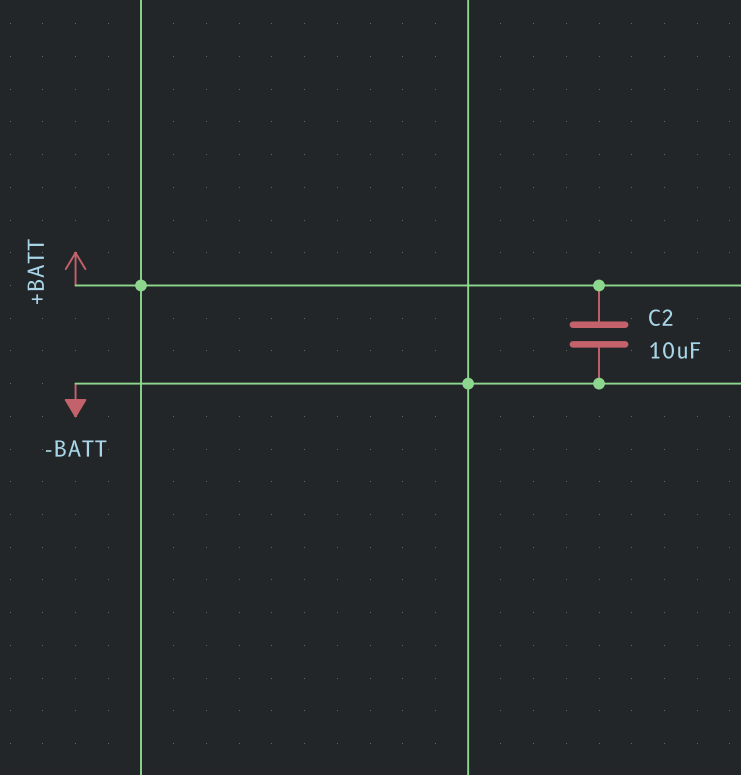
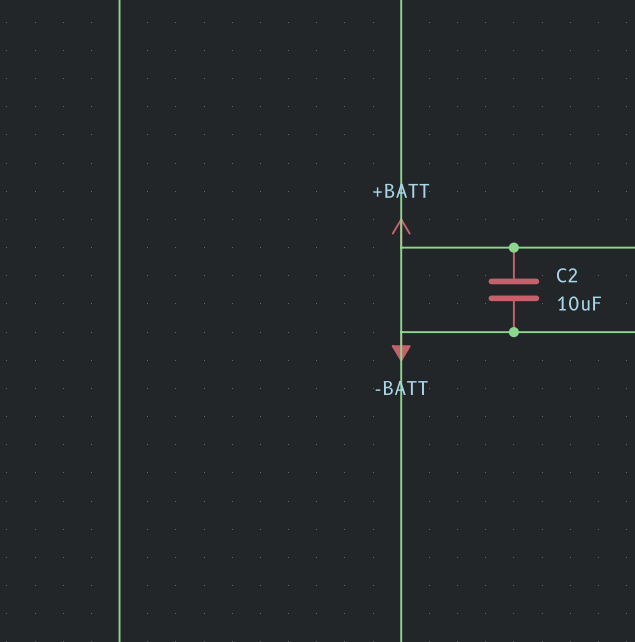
power symbol: +BATT (75, 269) -> none
power symbol: none -> +BATT (401, 233)
wire: (75, 285) (468, 285) -> none
junction: (140, 285) -> none
wire: (75, 383) (468, 383) -> none
junction: (468, 383) -> none
power symbol: -BATT (75, 399) -> none
power symbol: none -> -BATT (401, 346)

